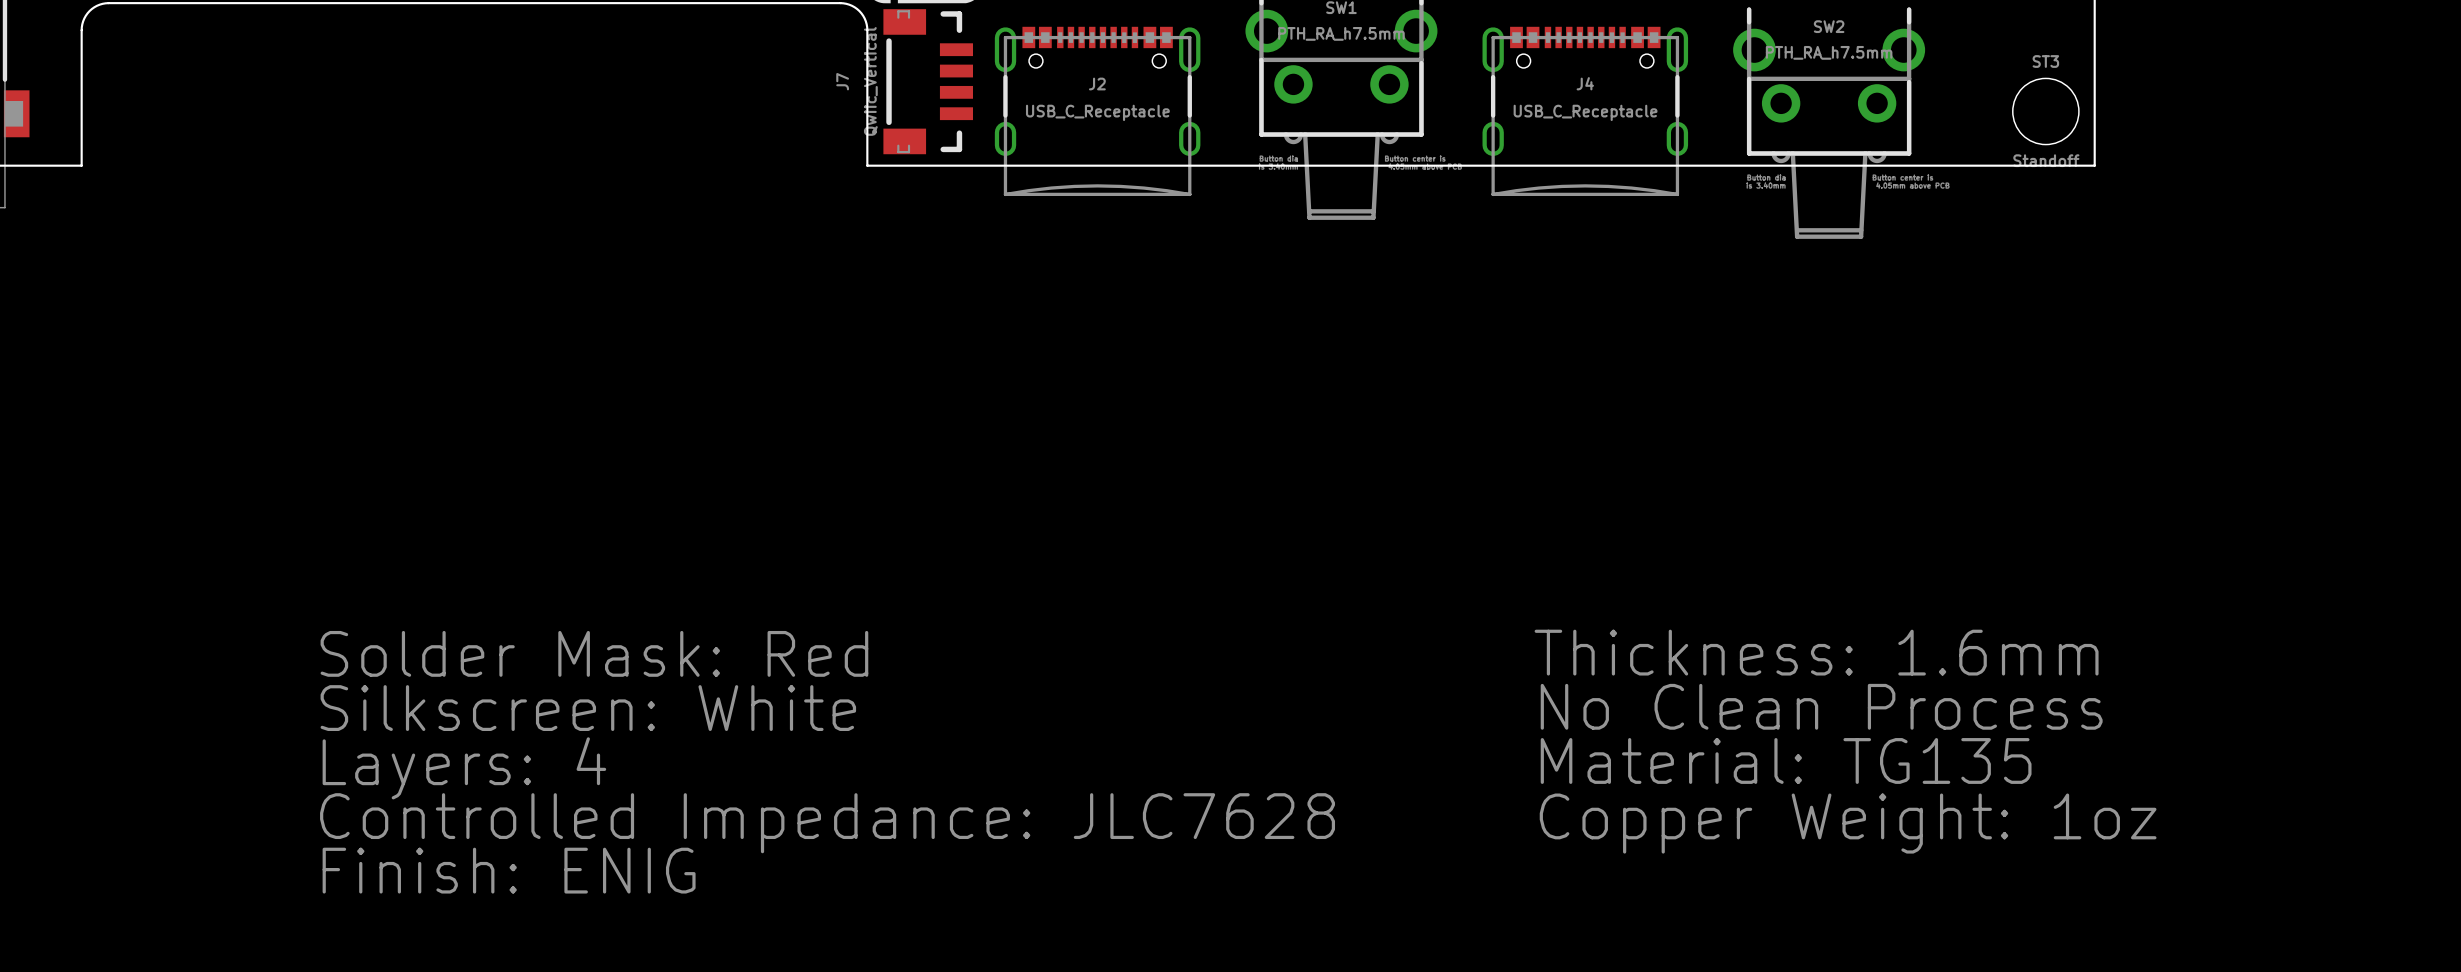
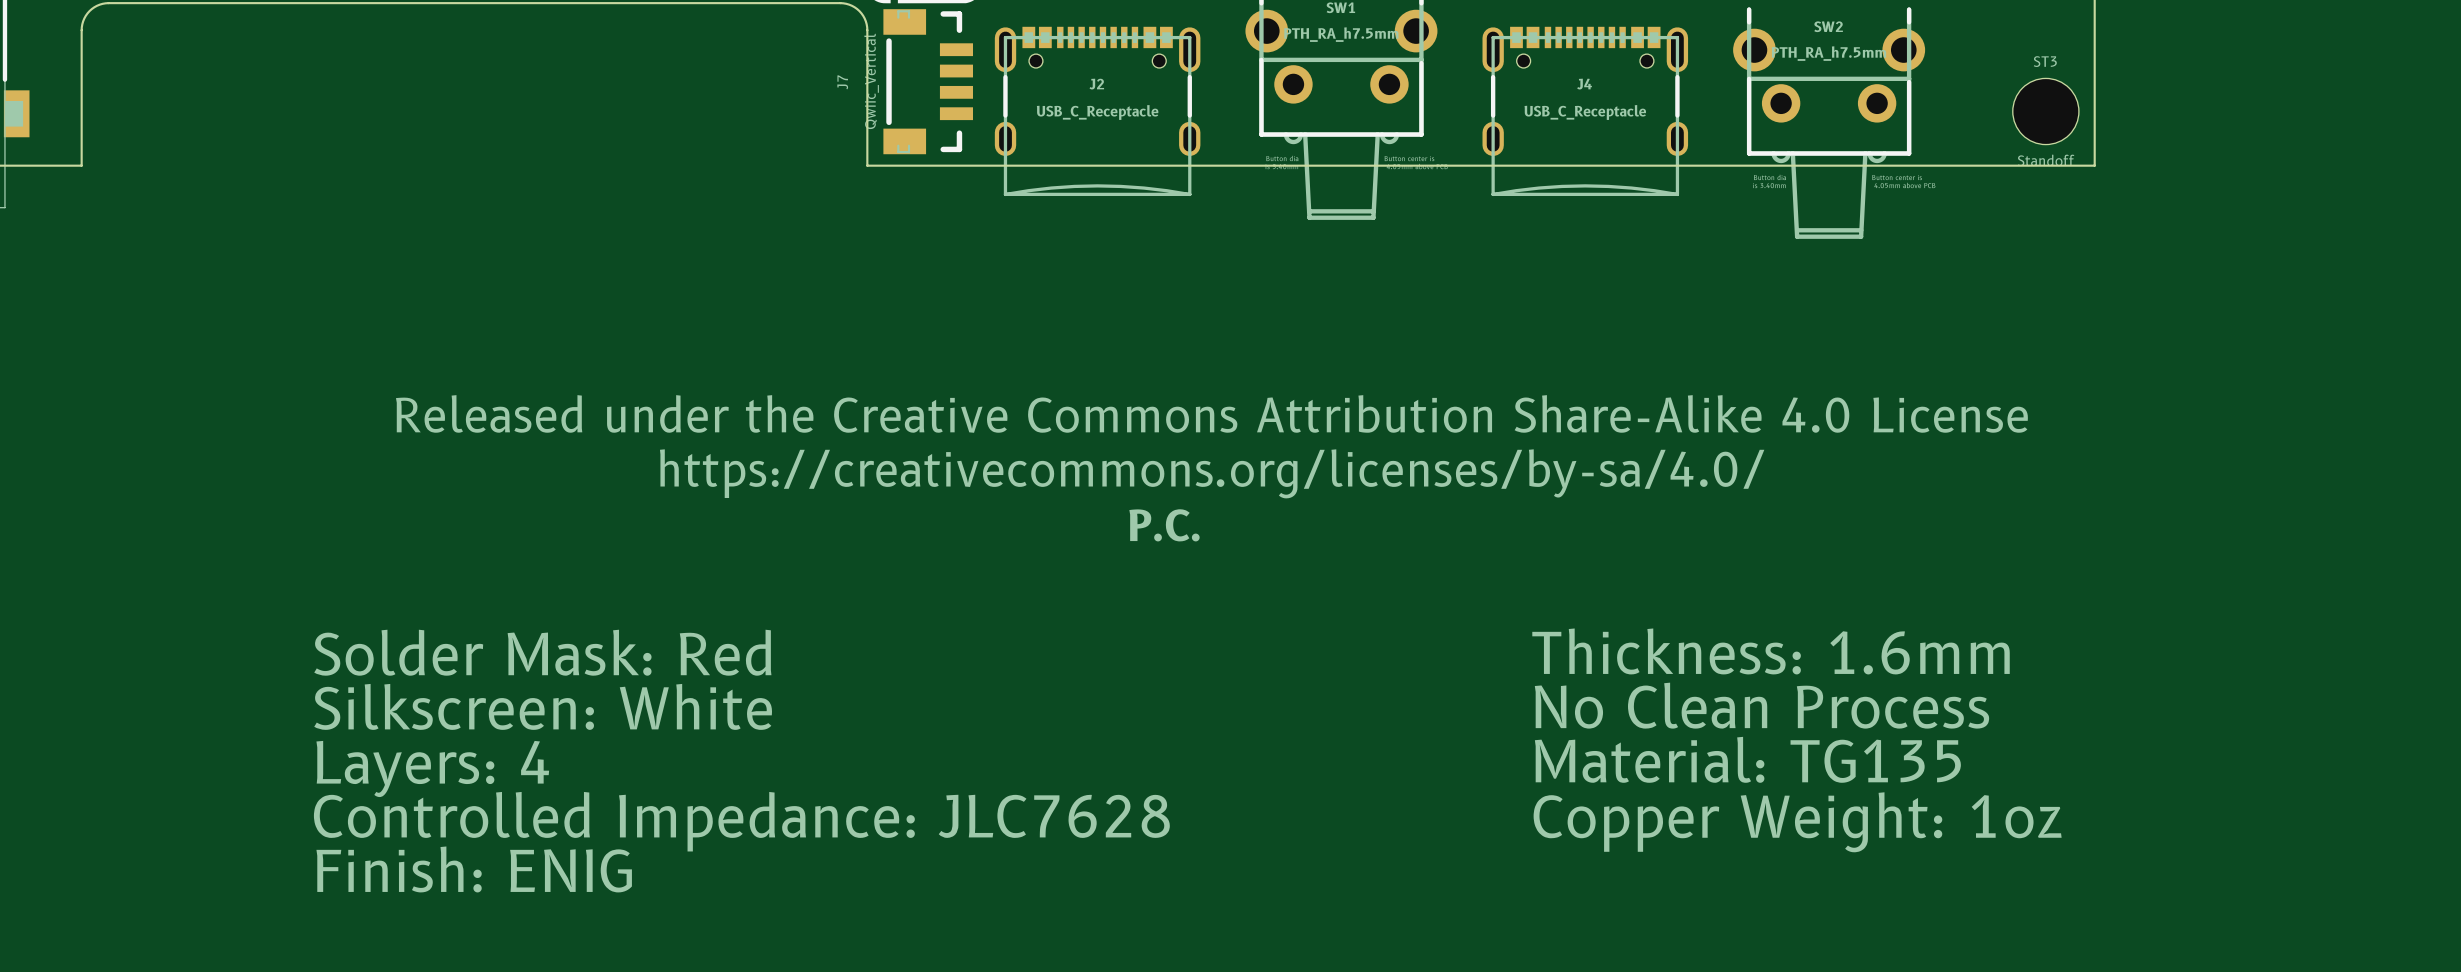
drawing: none -> [395, 395, 2028, 499]
text: none -> P.C. (1164, 525)

